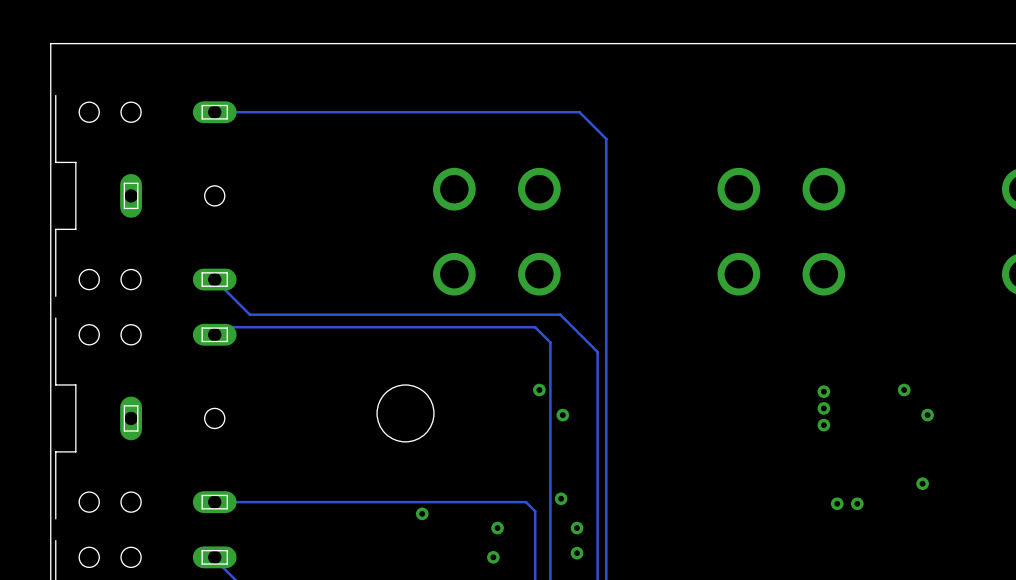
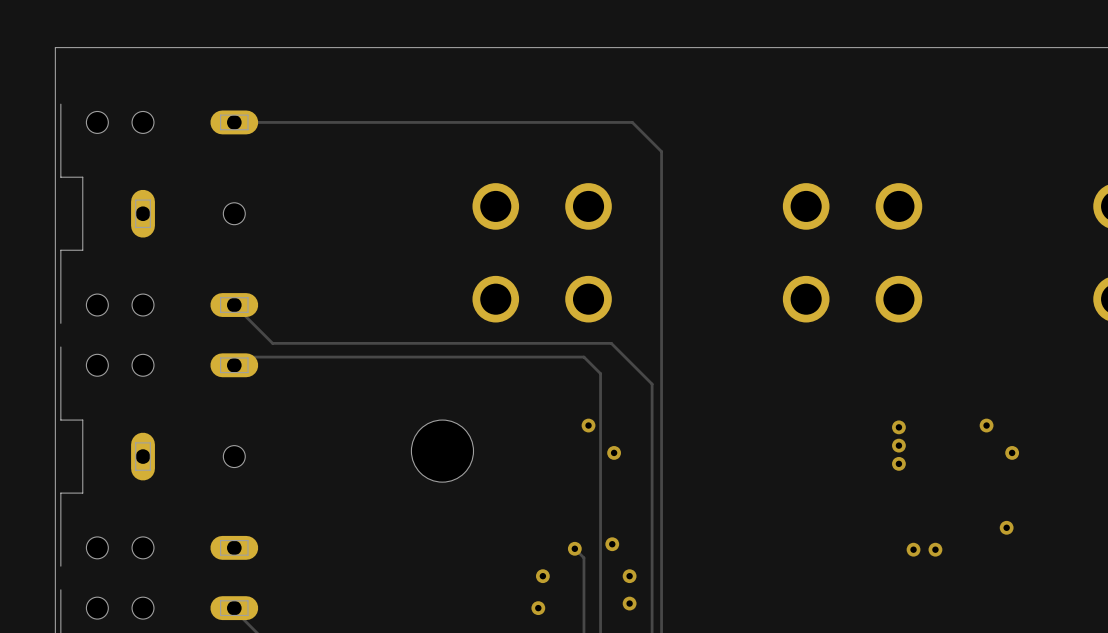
track: (214, 502) (526, 502) -> none
via: none -> (574, 548)
via: (422, 513) -> none

